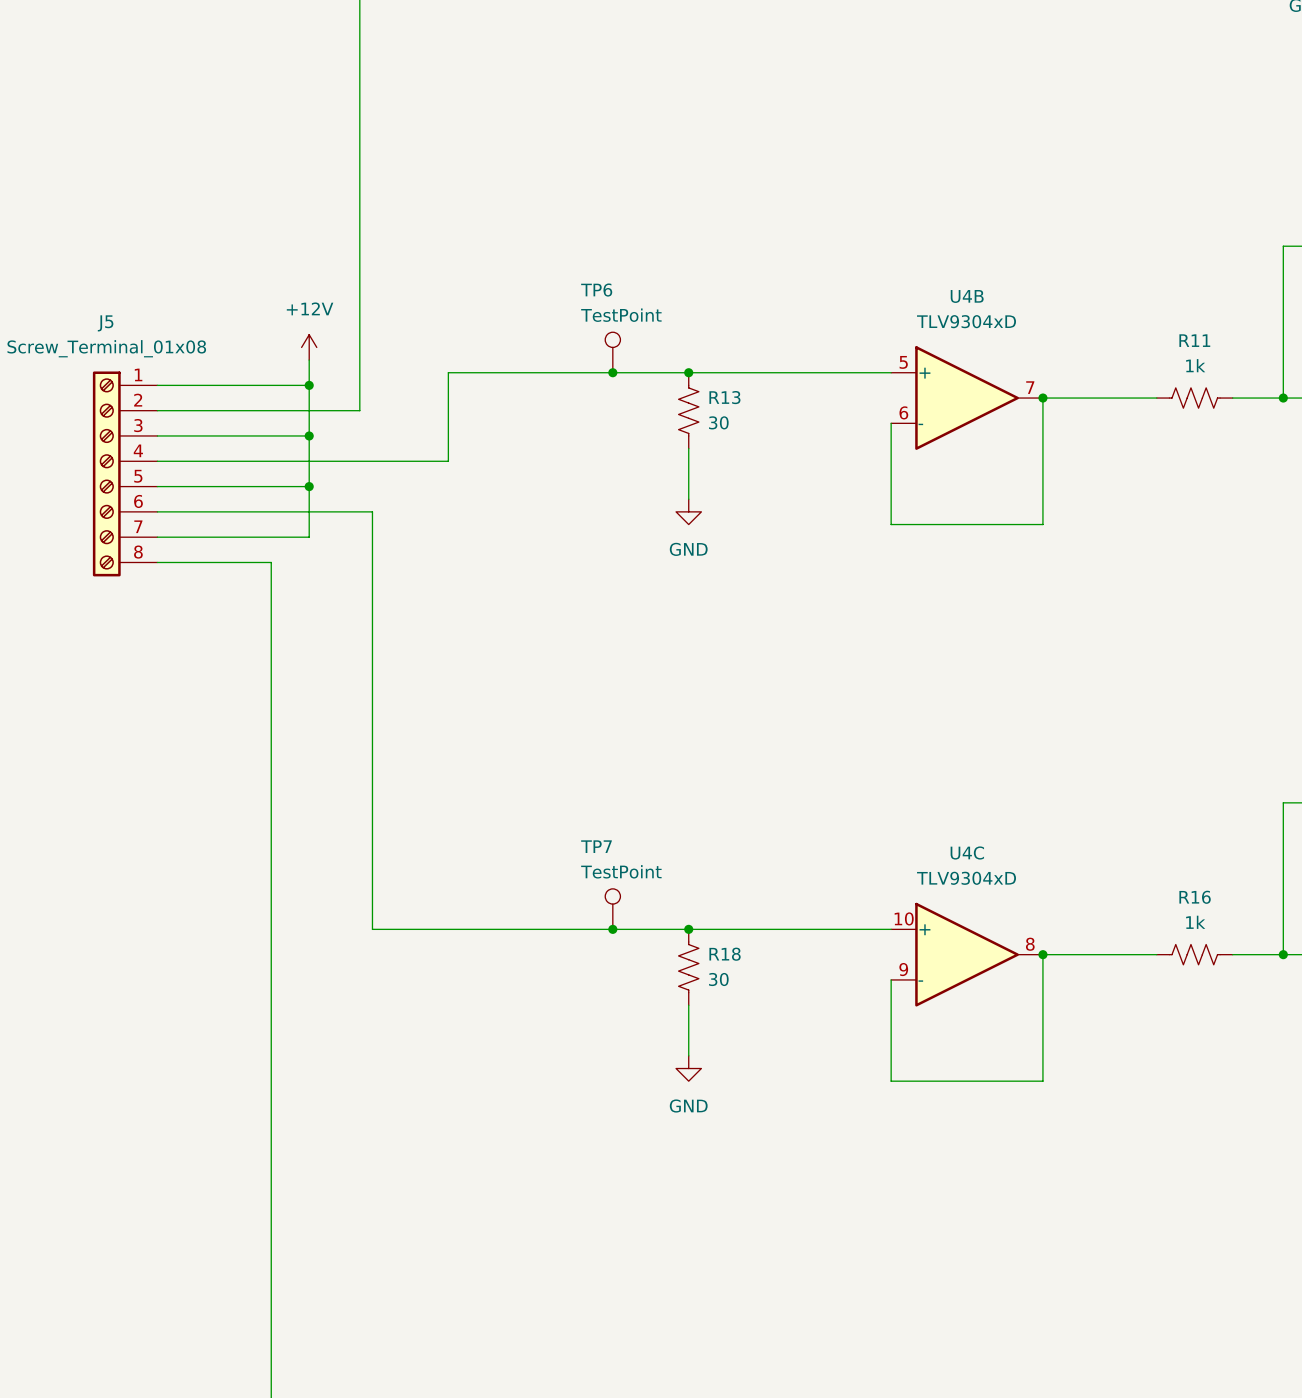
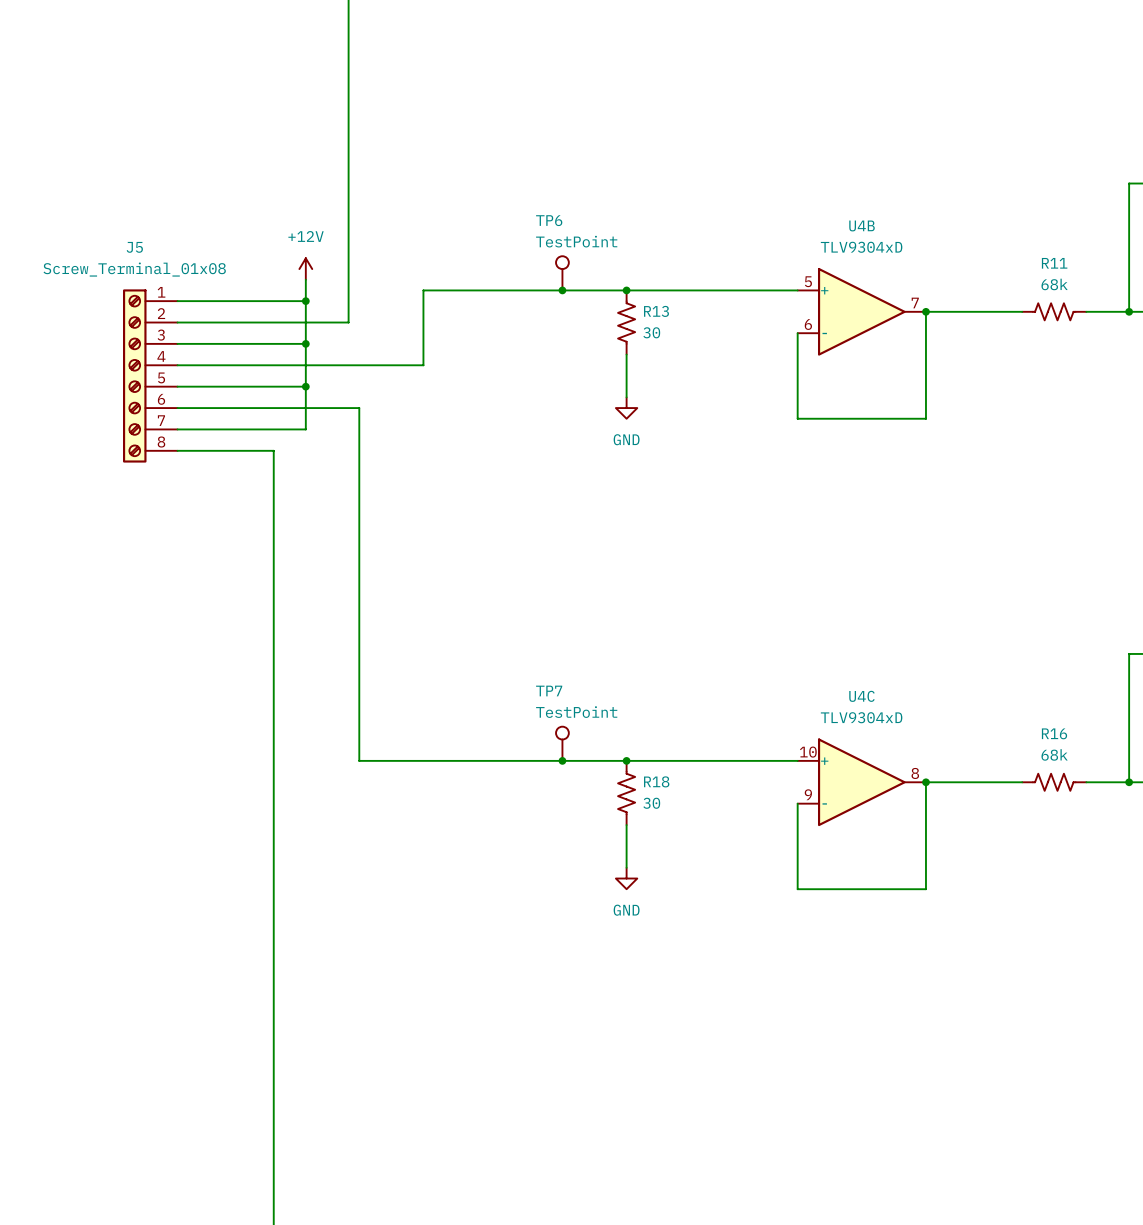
R11 value: 1k (1195, 365) -> 68k (1054, 284)
R16 value: 1k (1195, 922) -> 68k (1054, 754)

